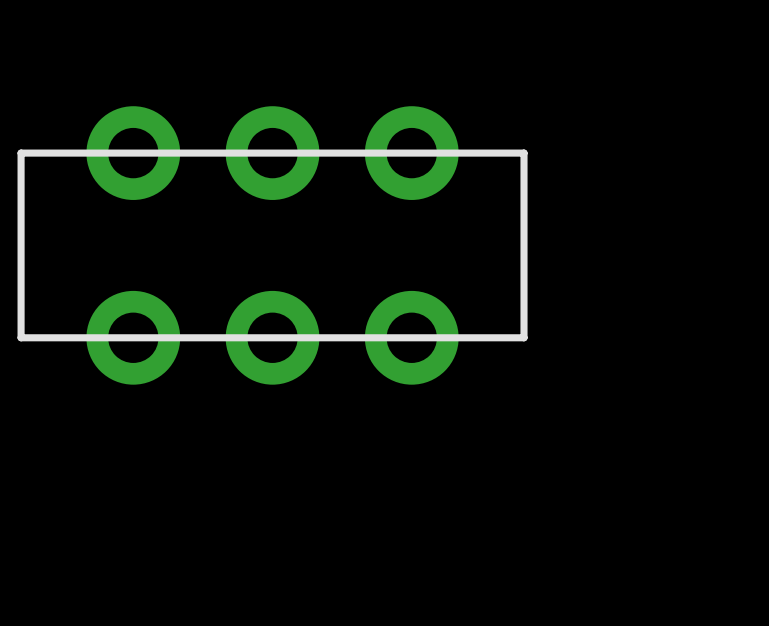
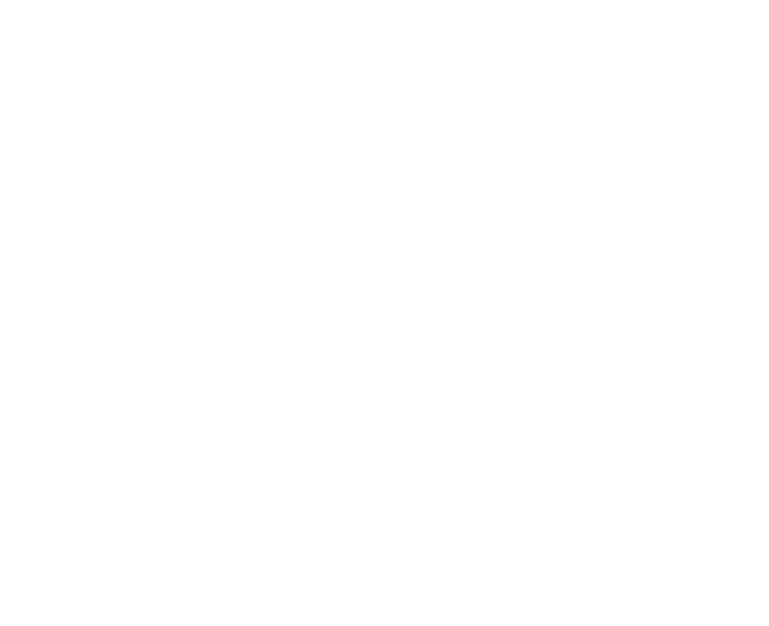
part: (272, 245) -> none

